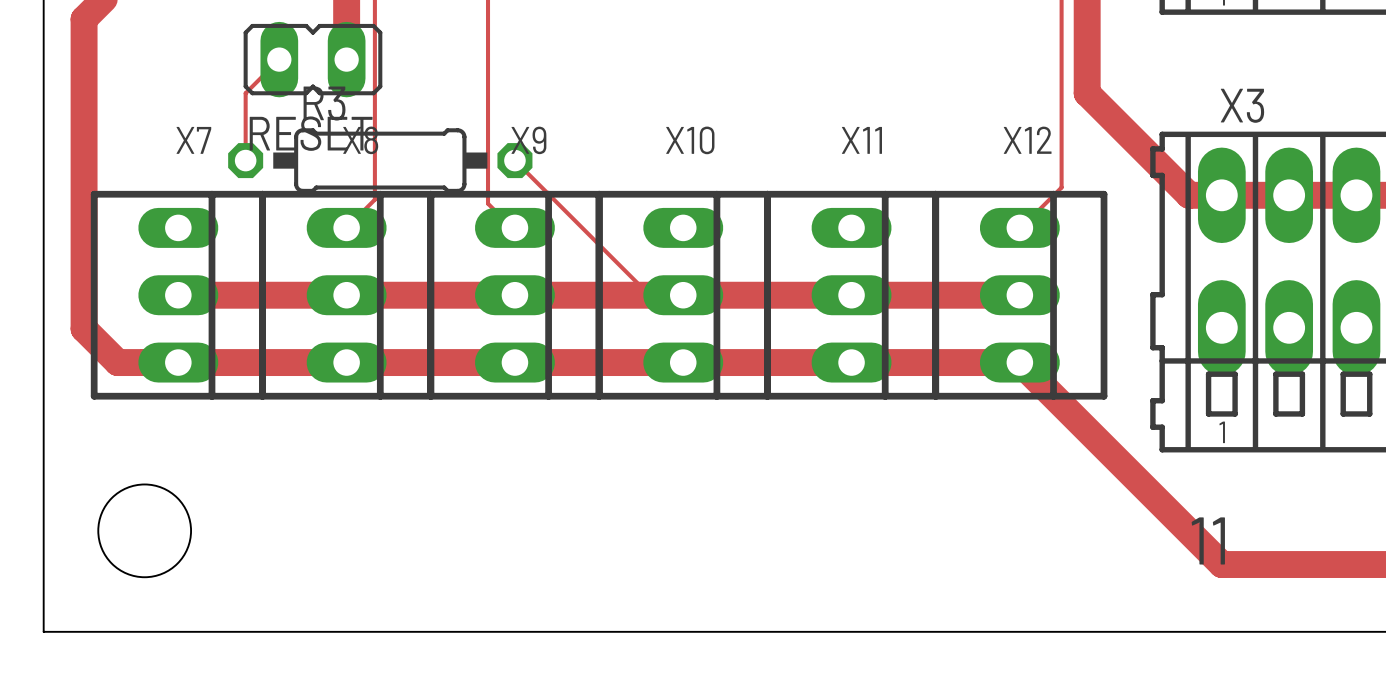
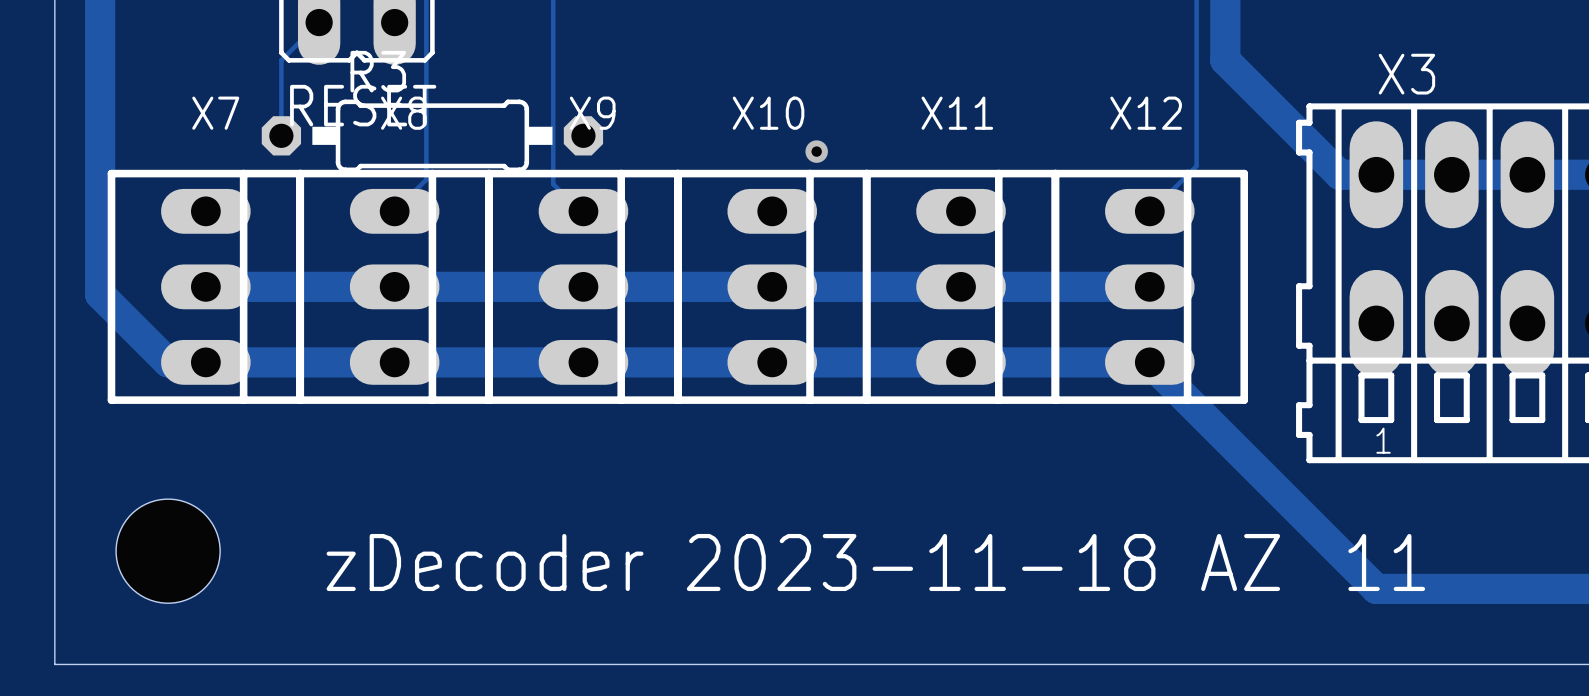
track: (514, 160) (649, 295) -> none
via: none -> (816, 151)
track: (84, 301) (84, 328) (117, 362) (144, 362) -> (100, 294) (168, 362)
text: none -> zDecoder 2023-11-18 AZ (803, 562)

